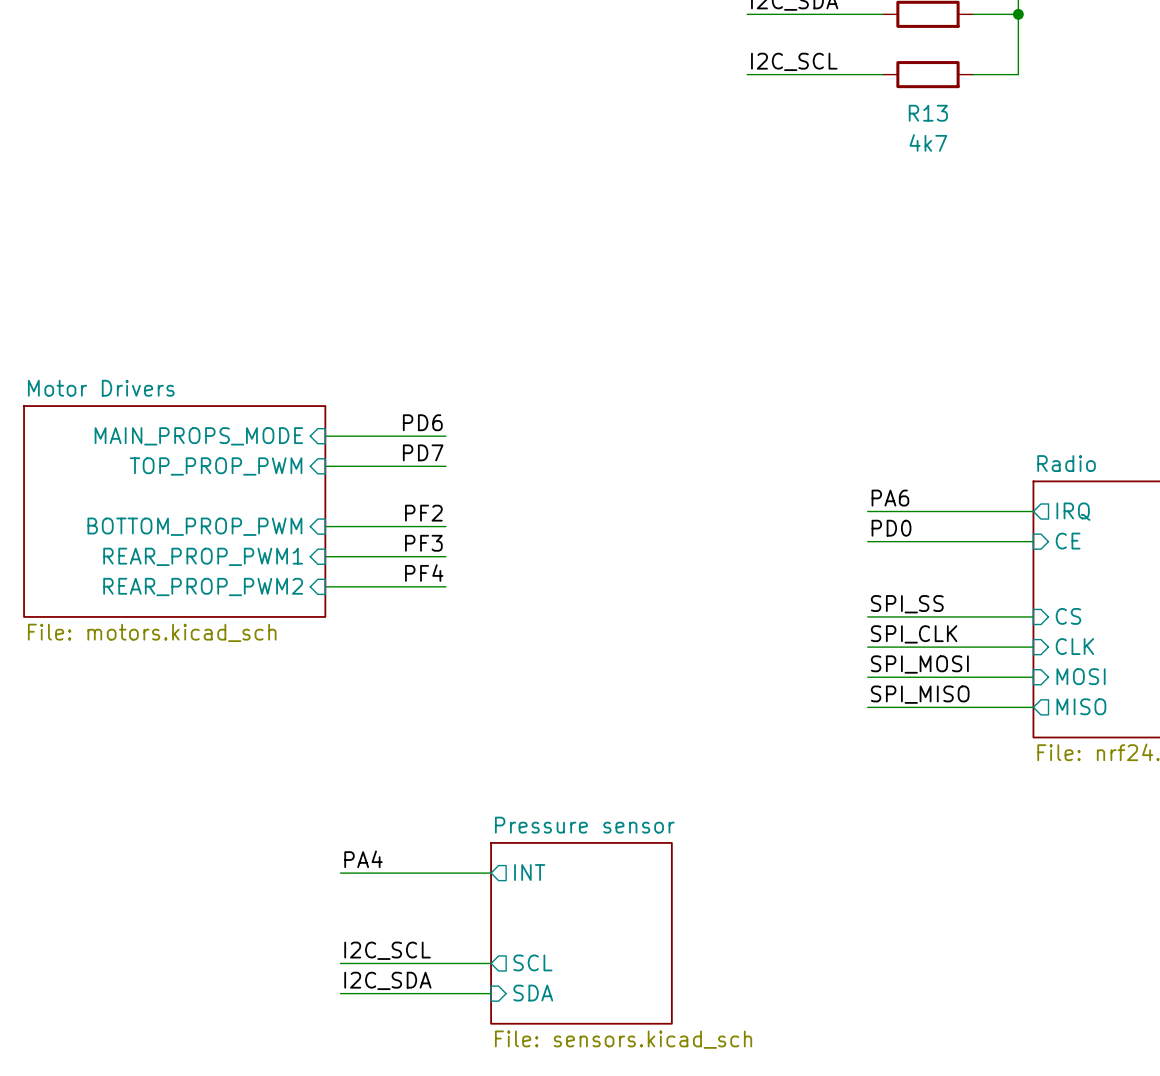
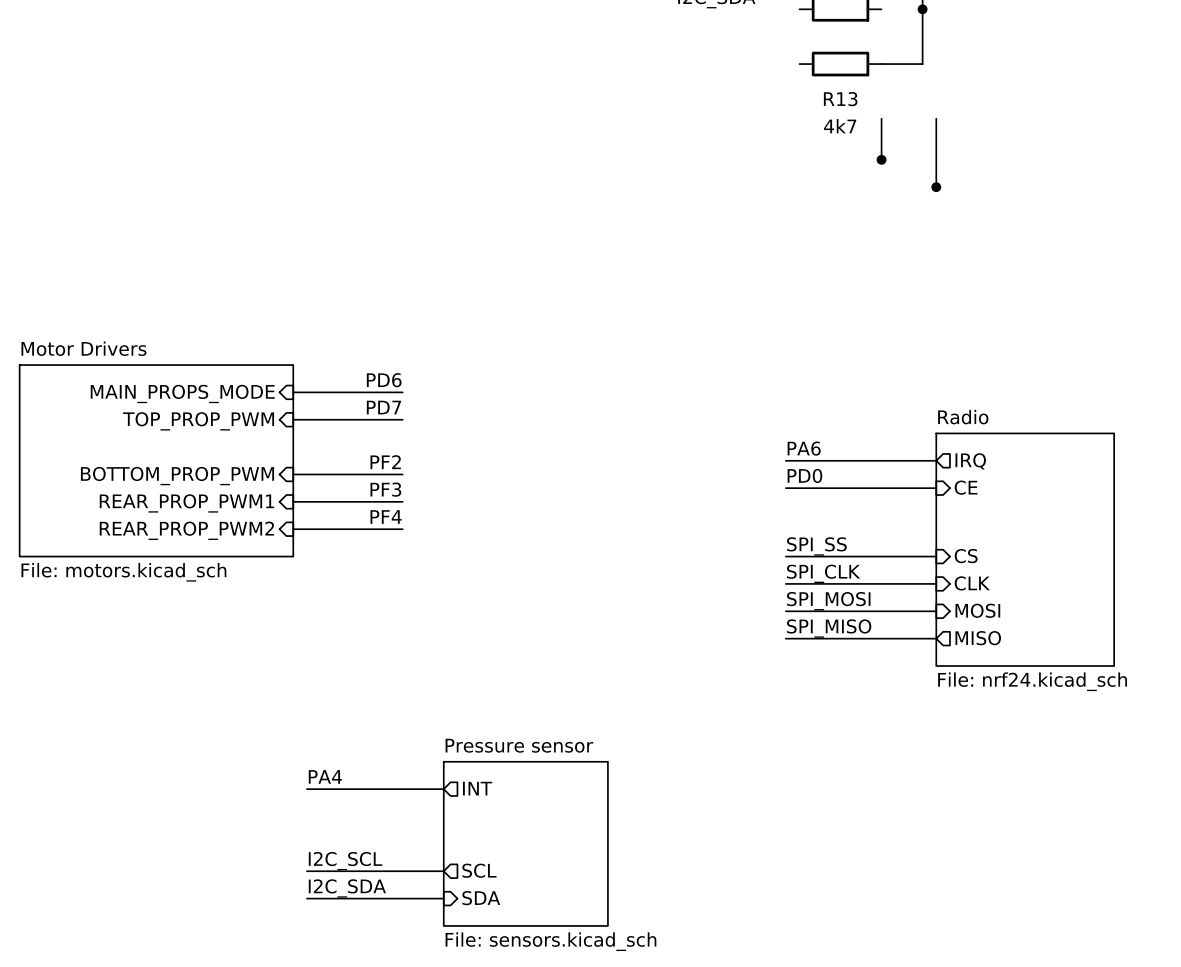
wire: (747, 14) (882, 14) -> none
wire: (973, 14) (1018, 14) -> none
label: I2C_SCL (794, 61) -> none
wire: (747, 74) (882, 74) -> none
wire: none -> (881, 118) (881, 159)
wire: none -> (936, 118) (936, 187)
junction: none -> (881, 159)
junction: none -> (936, 187)

